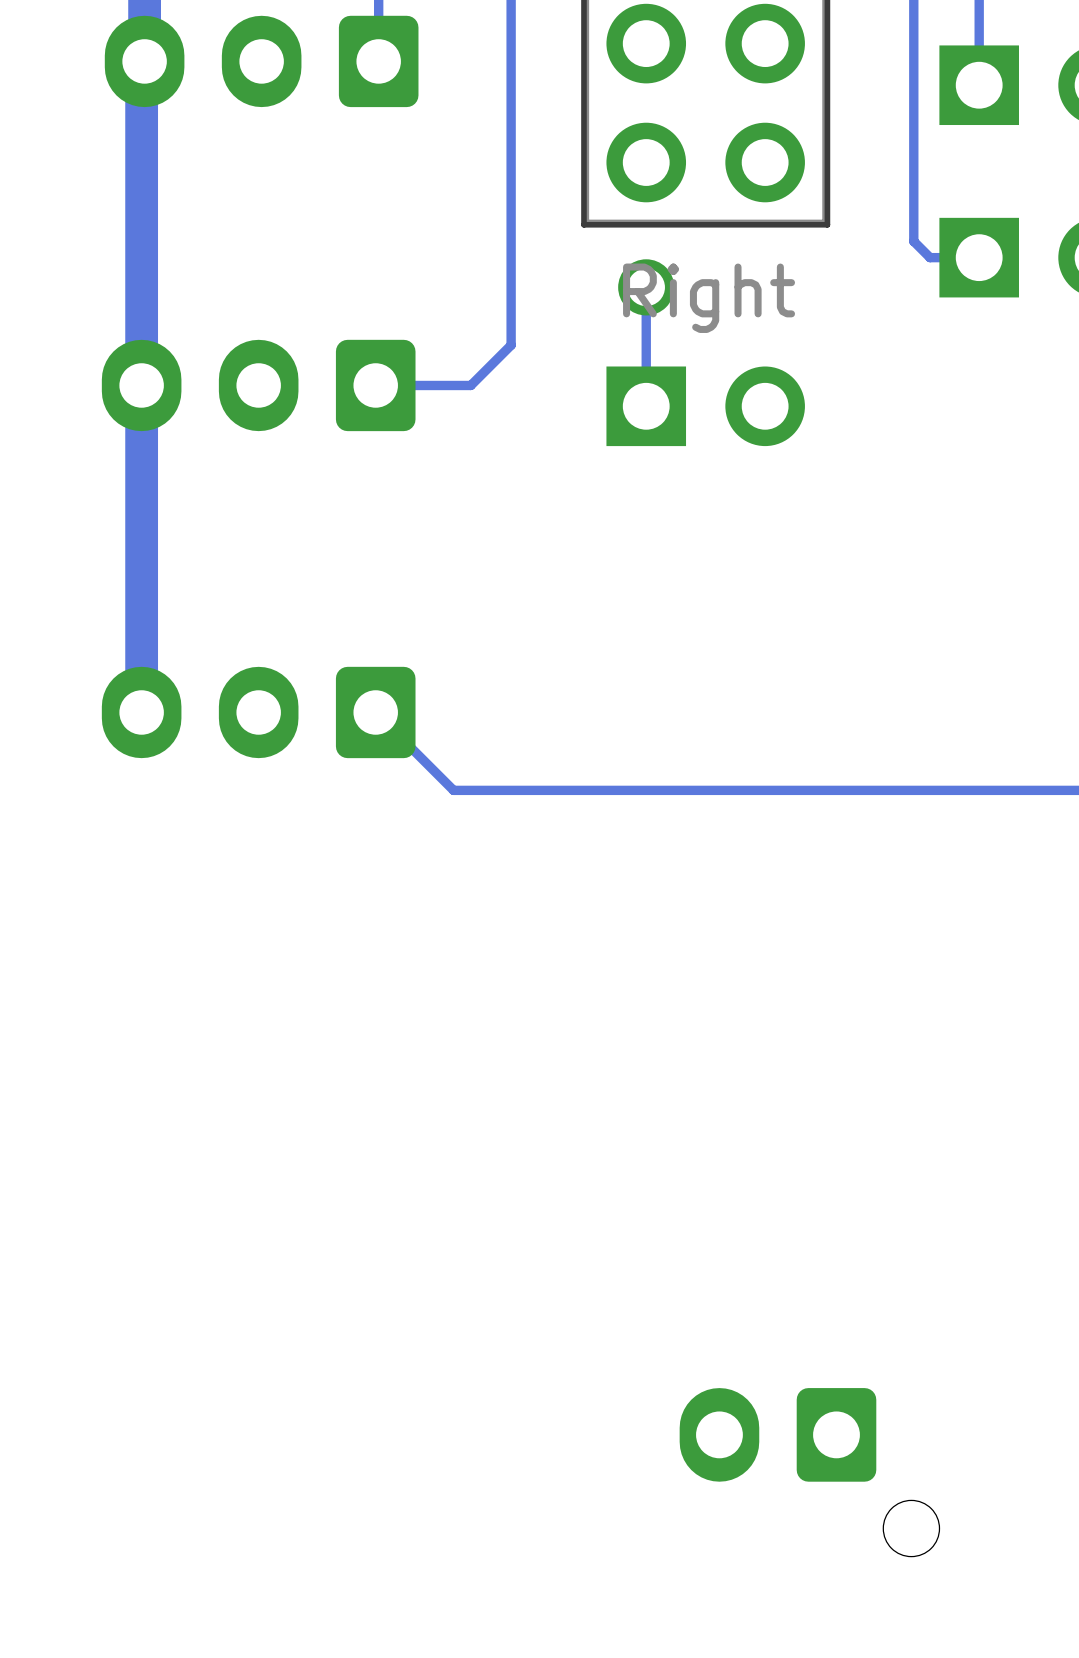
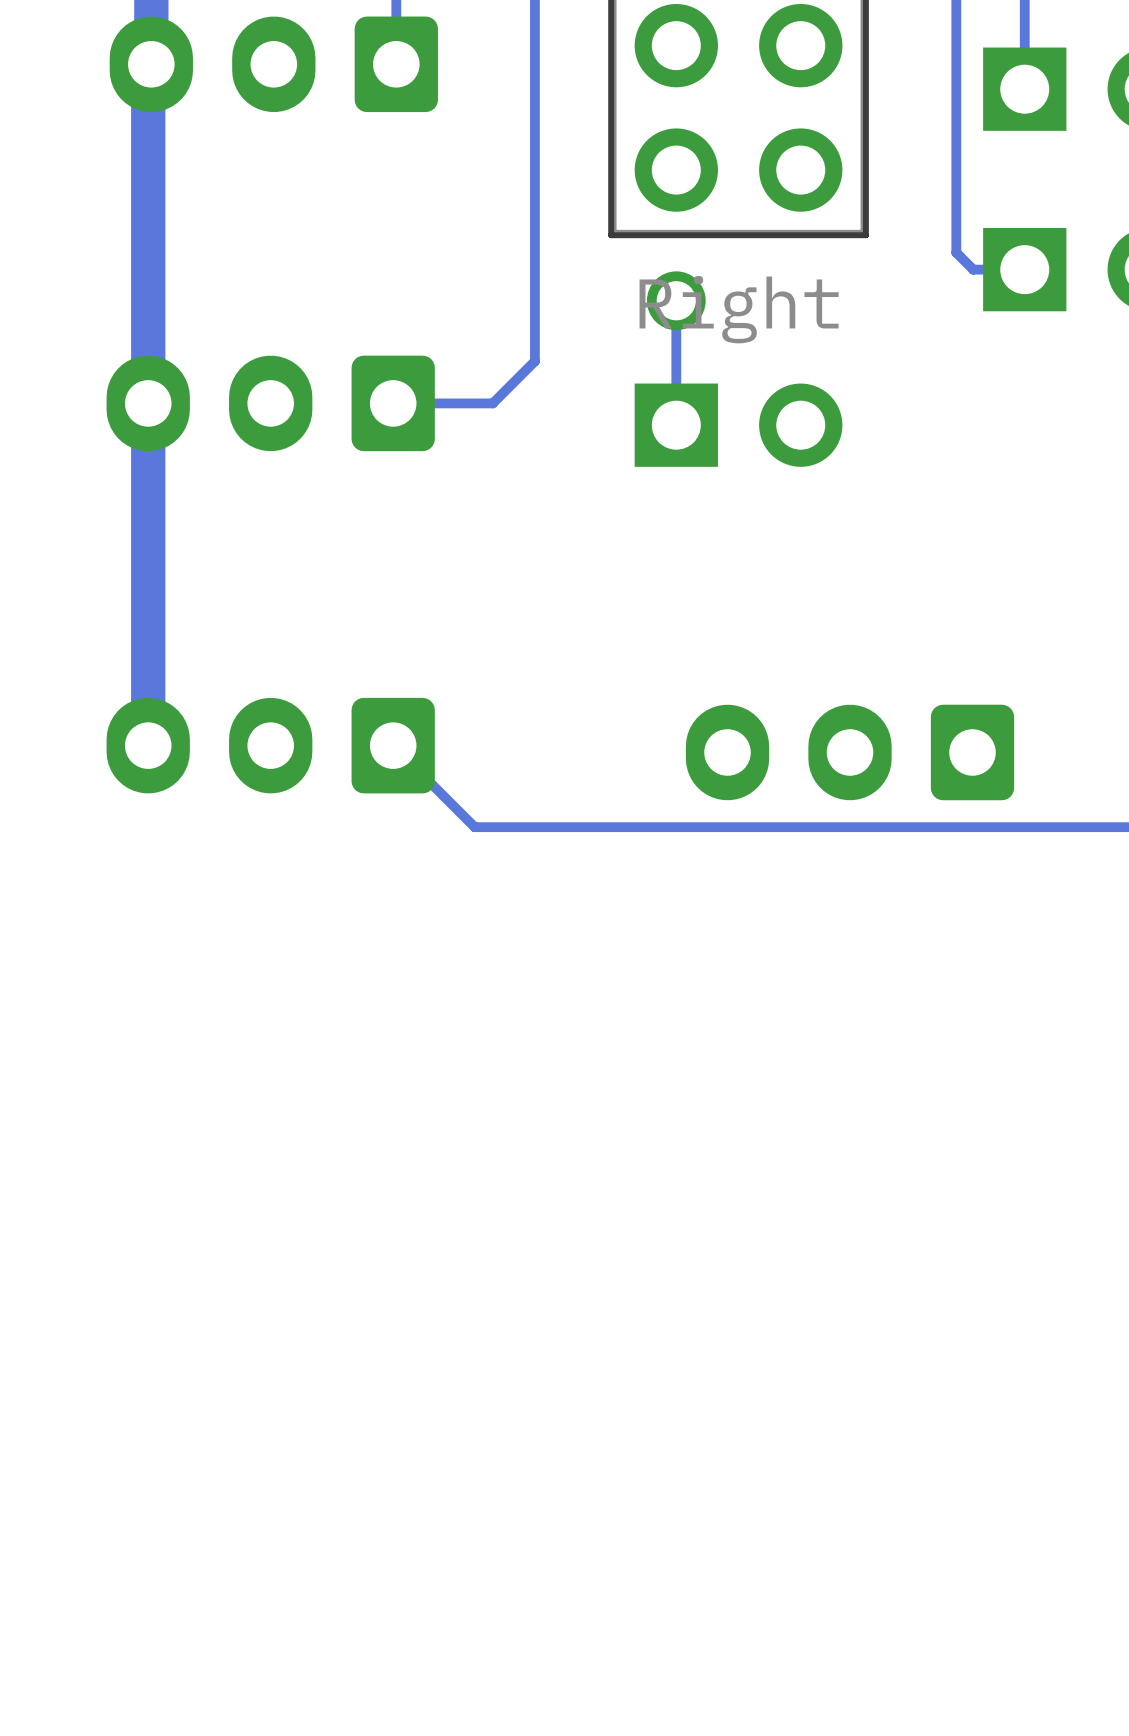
part: none -> (850, 752)
part: (809, 1472) -> none

